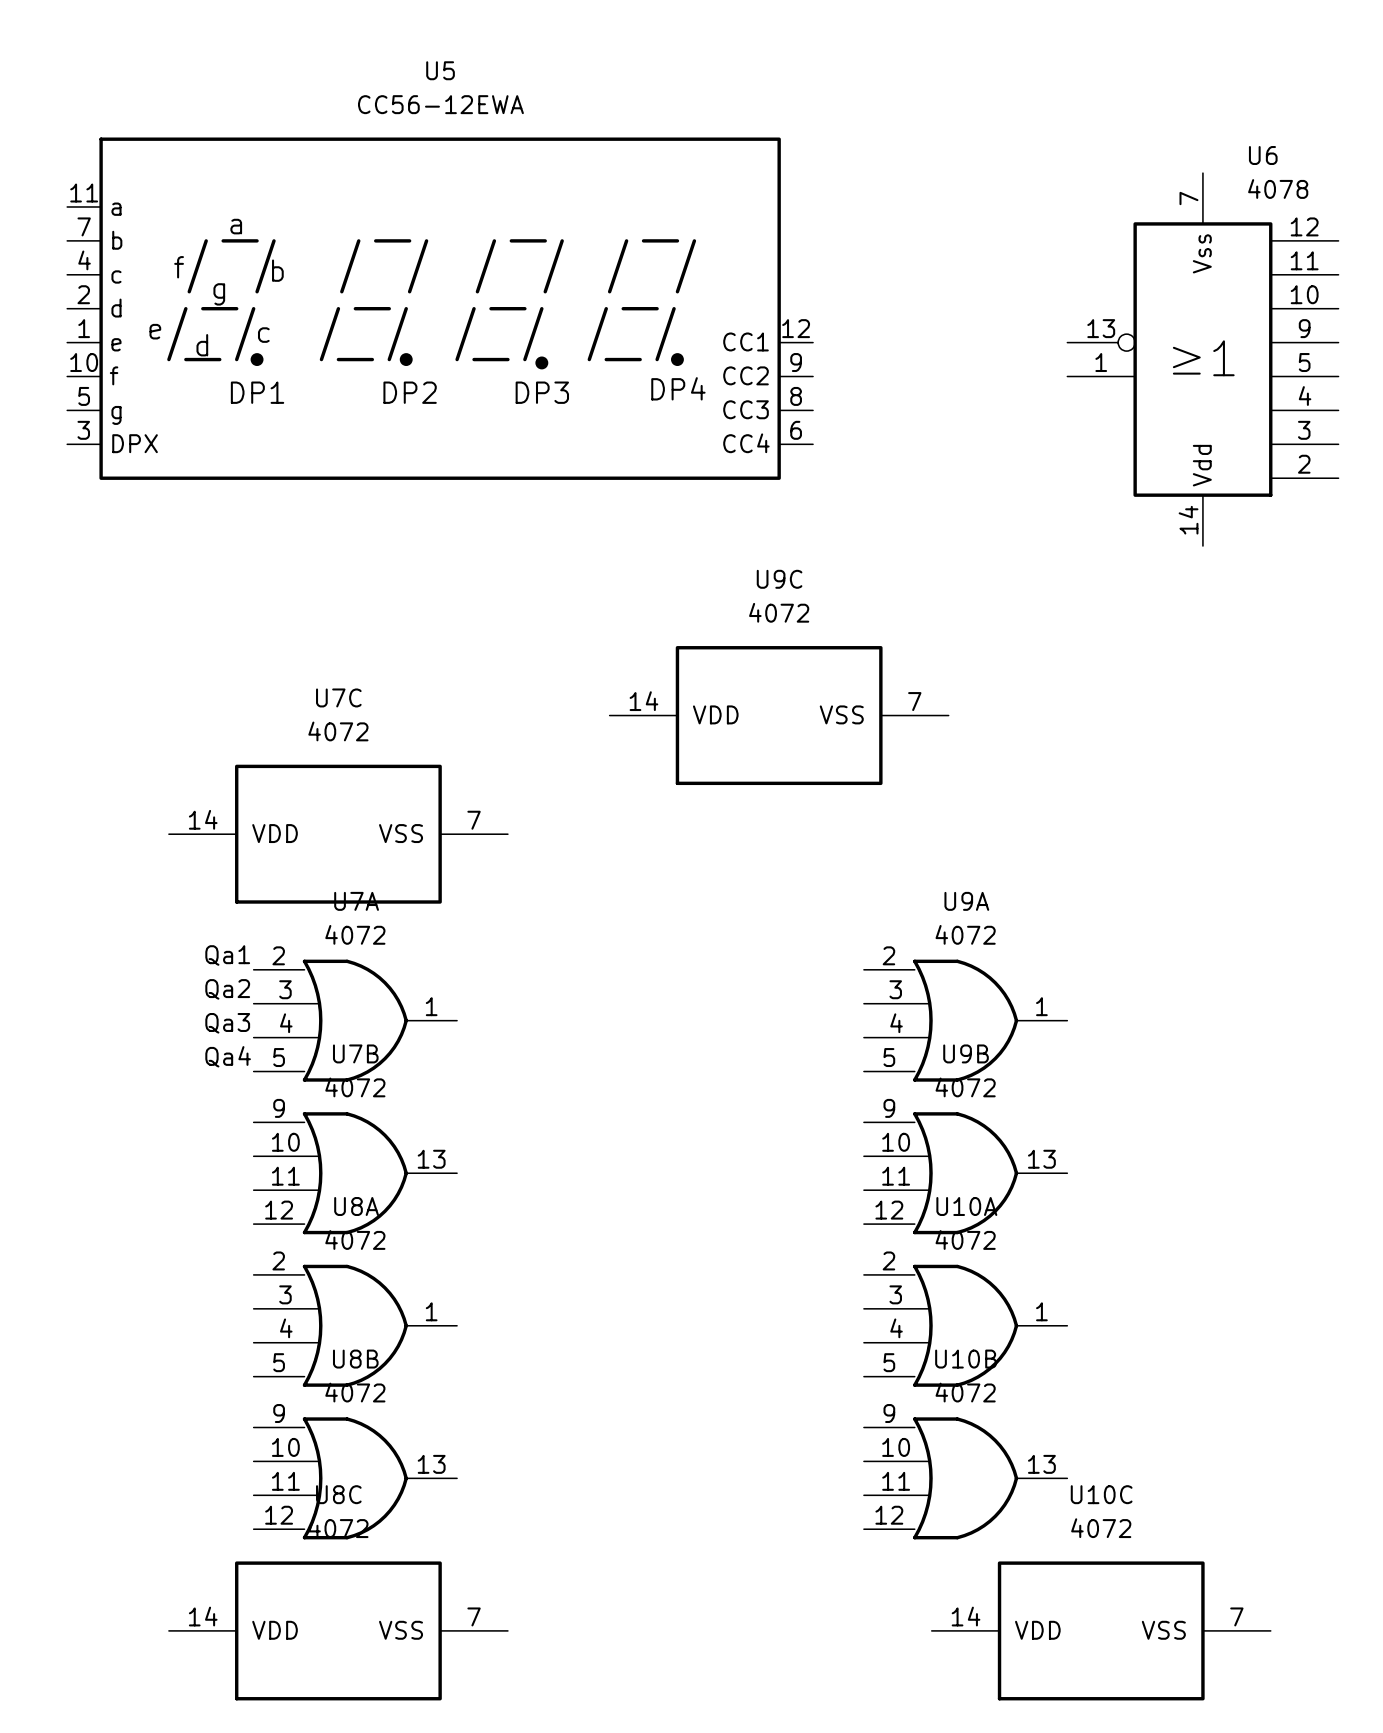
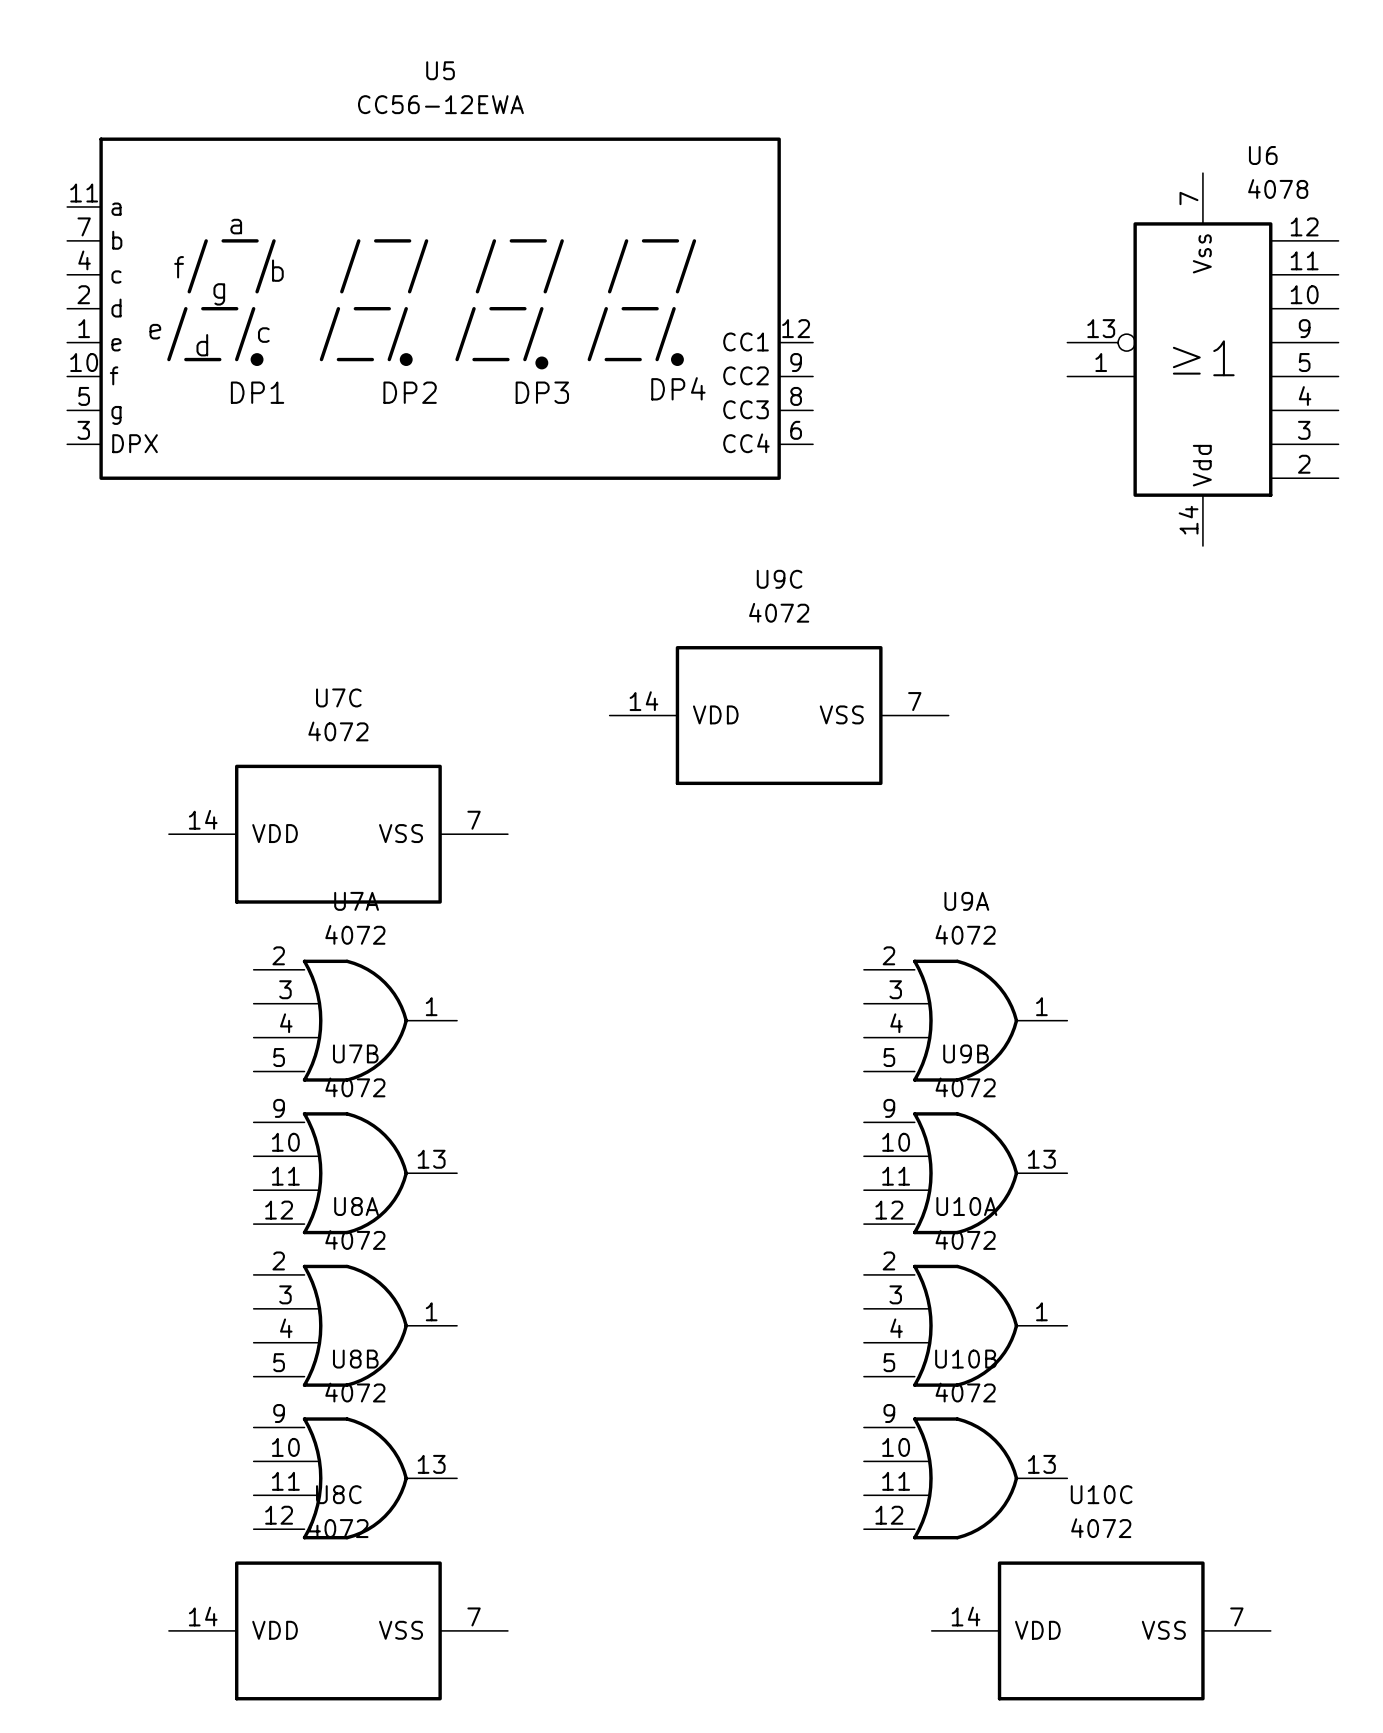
label: Qa1 (227, 955) -> none
label: Qa2 (227, 989) -> none
label: Qa3 (227, 1023) -> none
label: Qa4 (228, 1056) -> none

